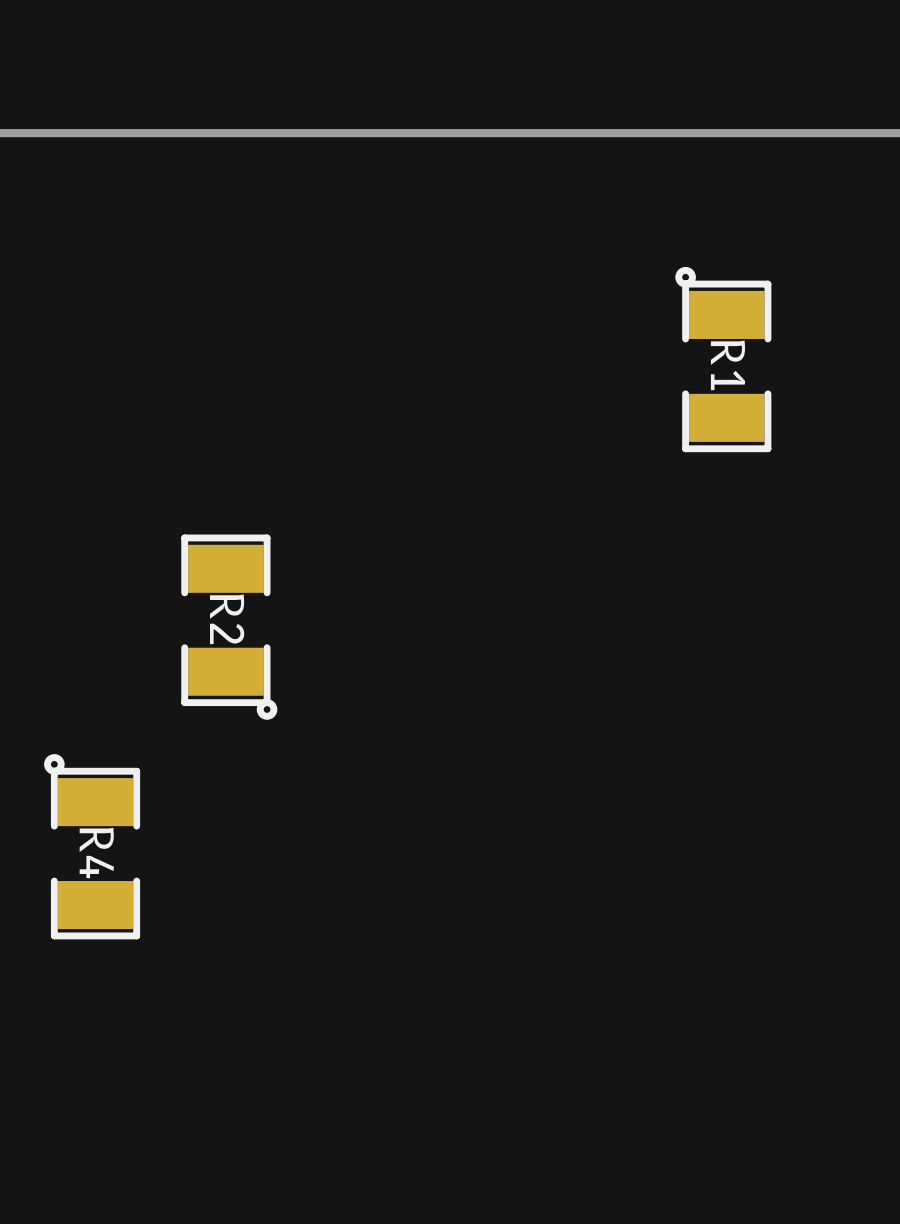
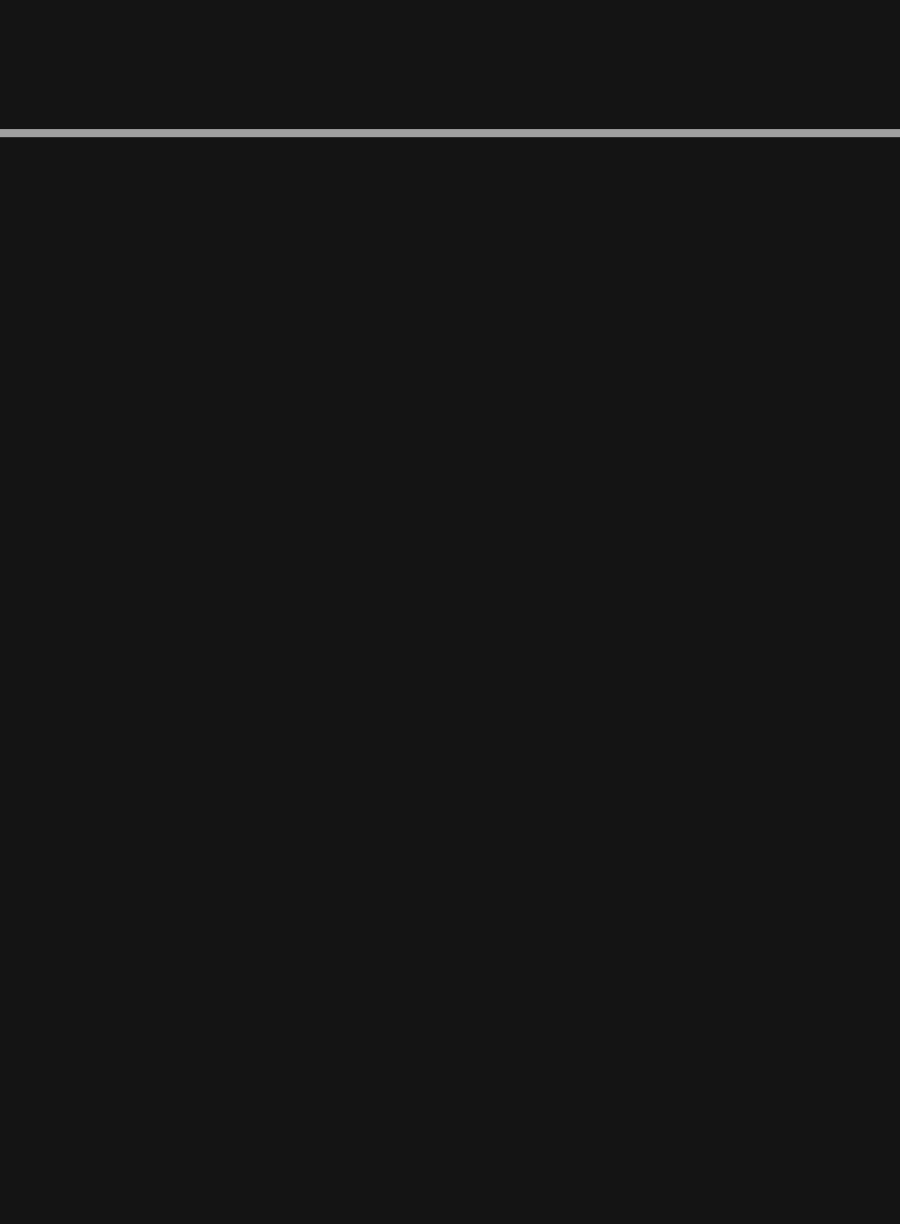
R1: (723, 359) -> none
R2: (229, 627) -> none
R4: (92, 846) -> none

